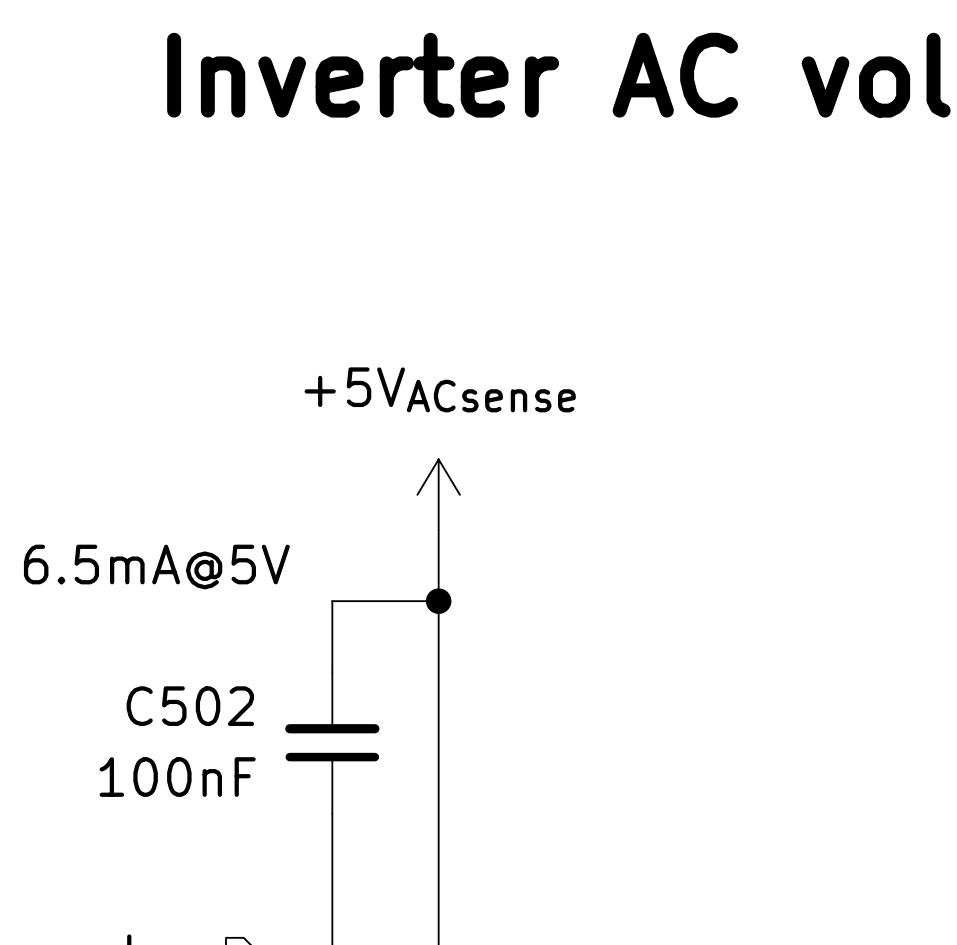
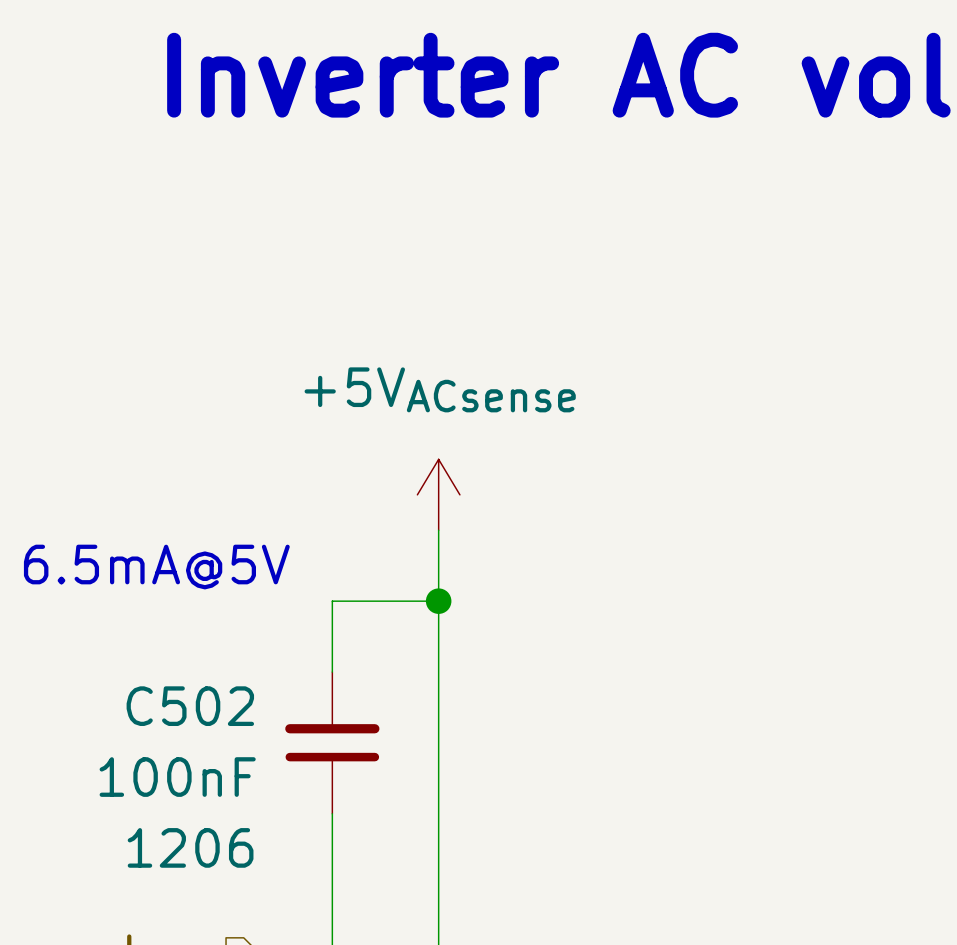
C502 text: none -> 1206 (190, 847)

